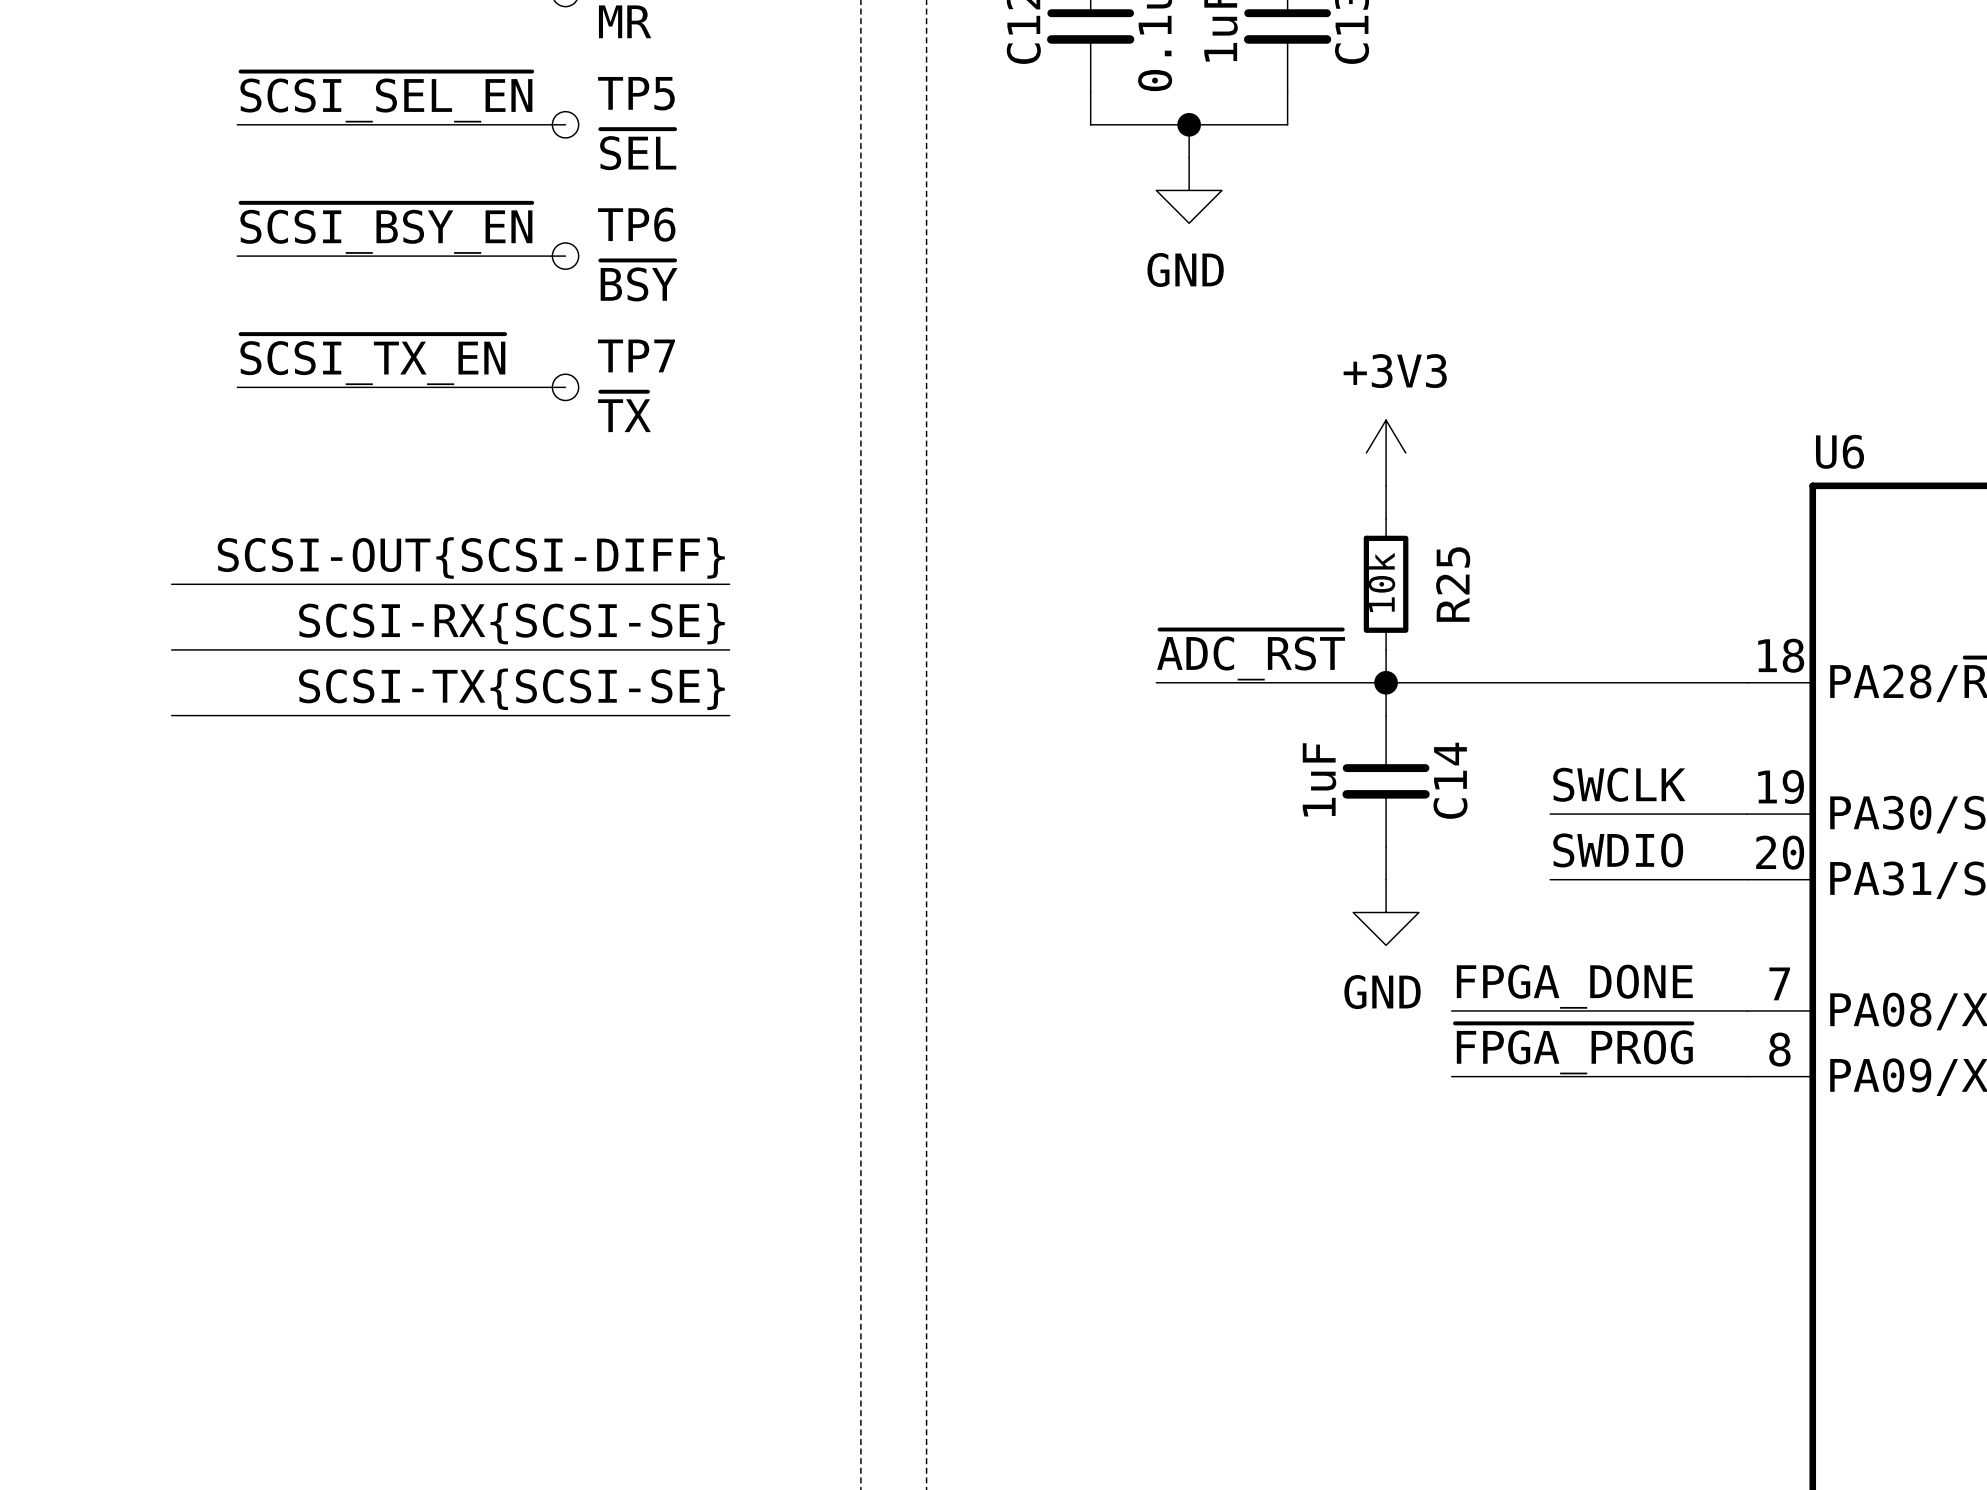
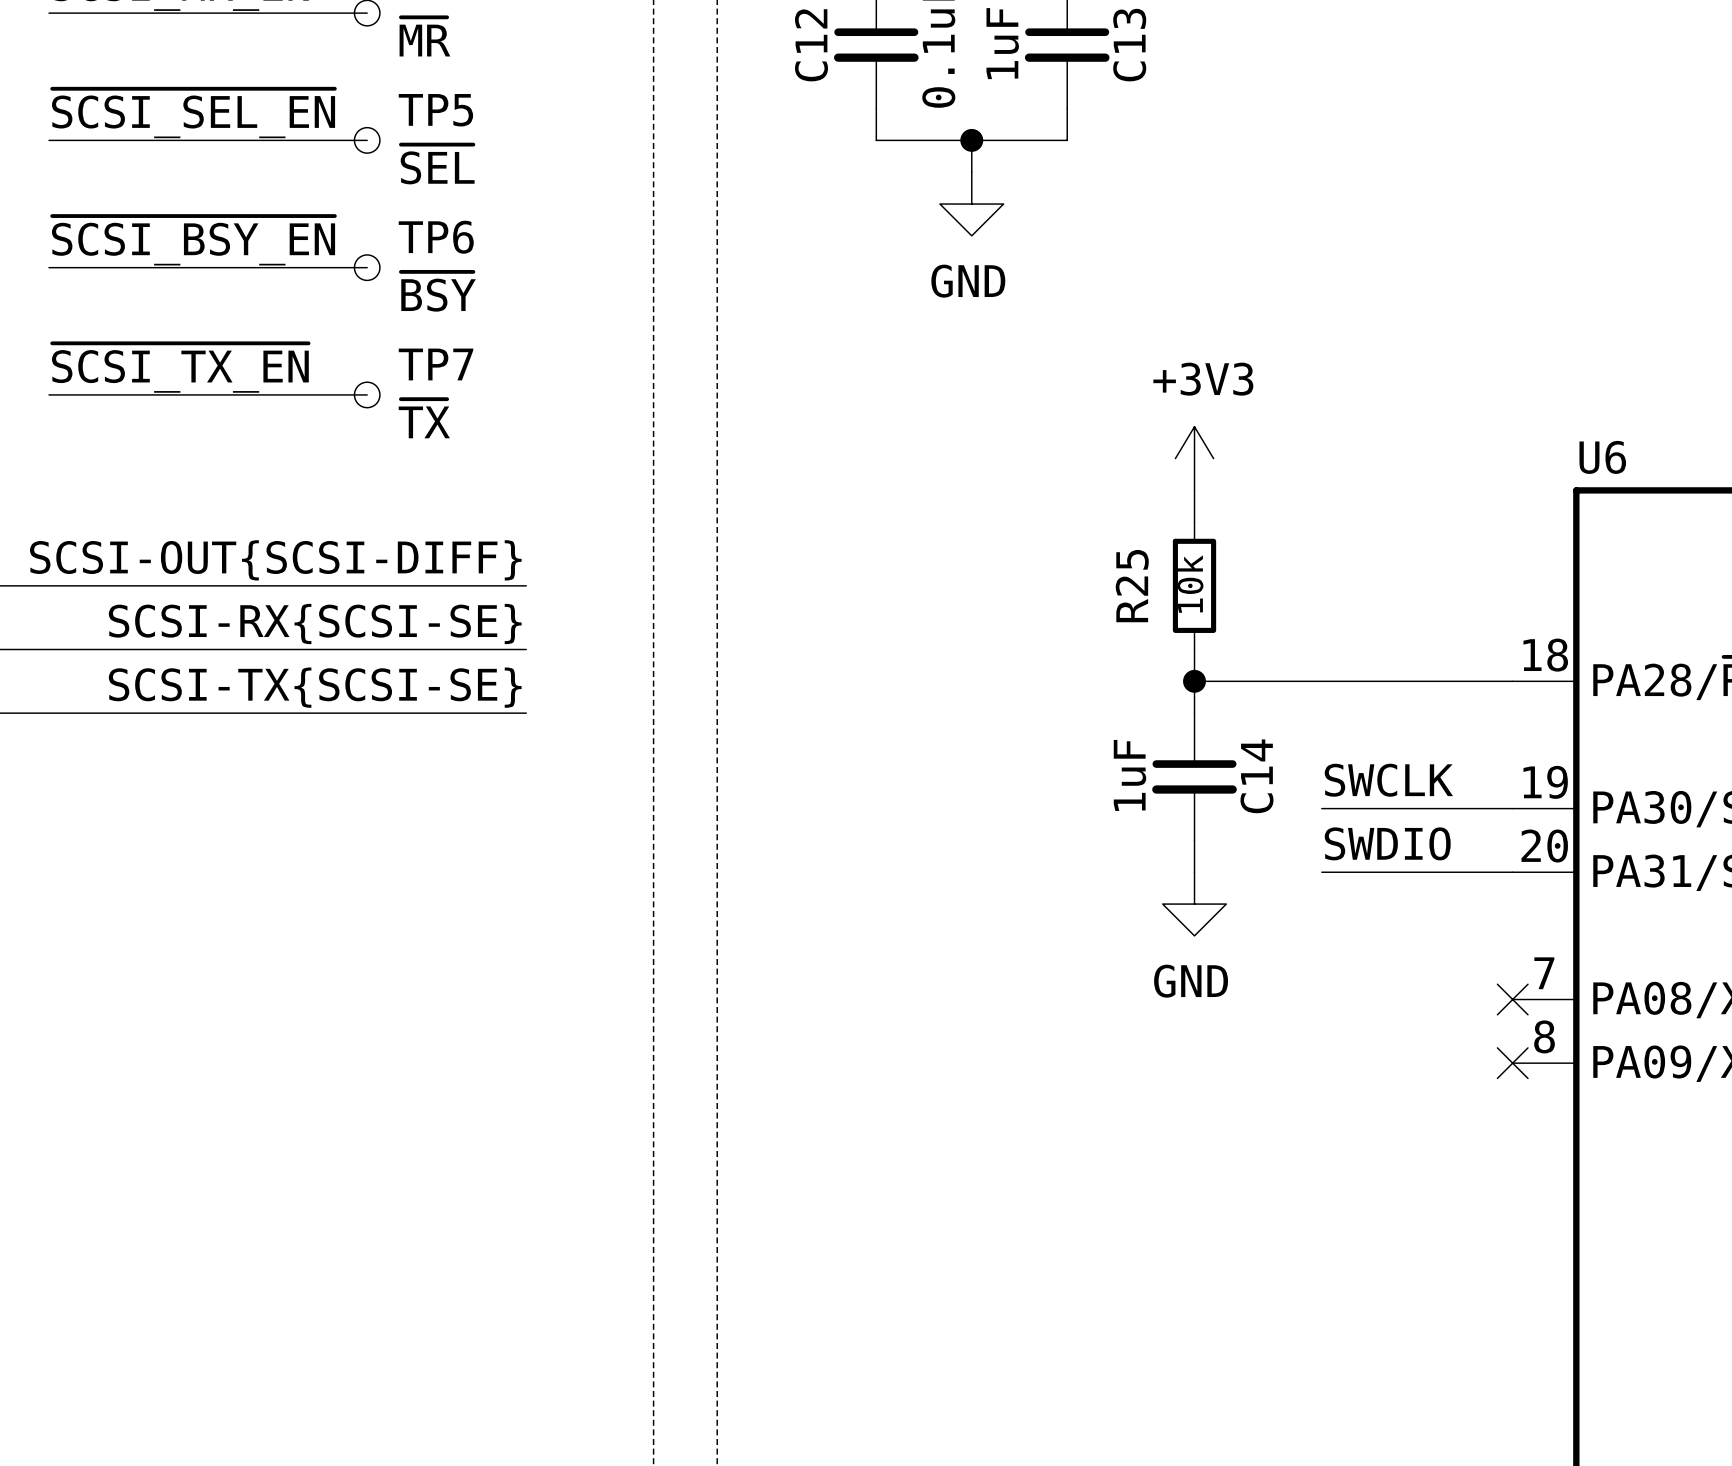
power symbol position: +3V3 (1386, 453) -> +3V3 (1194, 458)
wire: (1386, 485) (1386, 518) -> (1194, 490) (1194, 522)
R25 position: (1386, 584) -> (1194, 585)
R25 name position: R25 (1453, 584) -> R25 (1132, 586)
wire: (1386, 649) (1386, 715) -> (1194, 649) (1194, 713)
label: ~{ADC_RST} (1251, 655) -> none
wire: (1156, 682) (1418, 682) -> none
junction position: (1386, 682) -> (1194, 681)
C14 position: (1386, 781) -> (1194, 776)
wire: (1386, 846) (1386, 879) -> (1194, 840) (1194, 872)
power symbol position: GND (1386, 912) -> GND (1194, 904)
label: FPGA_DONE (1574, 986) -> none
wire: (1451, 1010) (1747, 1010) -> none
no-connect mark: none -> (1512, 999)
label: ~{FPGA_PROG} (1573, 1048) -> none
wire: (1451, 1076) (1747, 1076) -> none
no-connect mark: none -> (1512, 1063)

